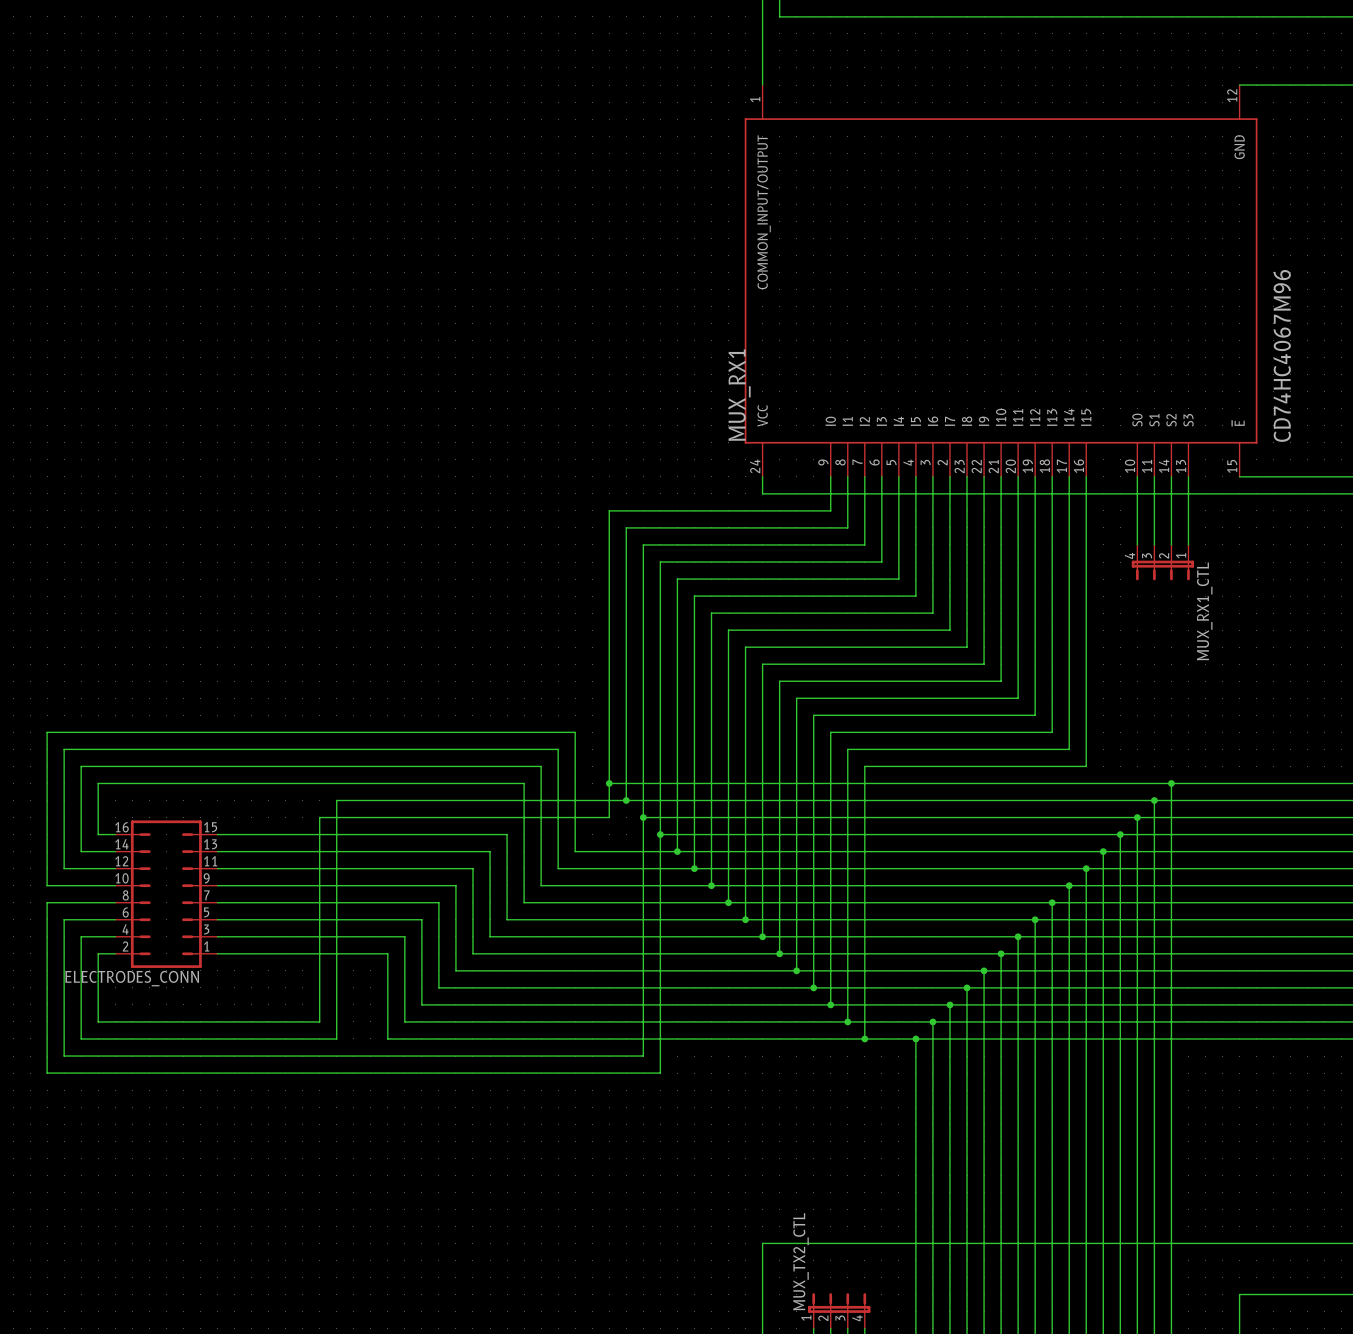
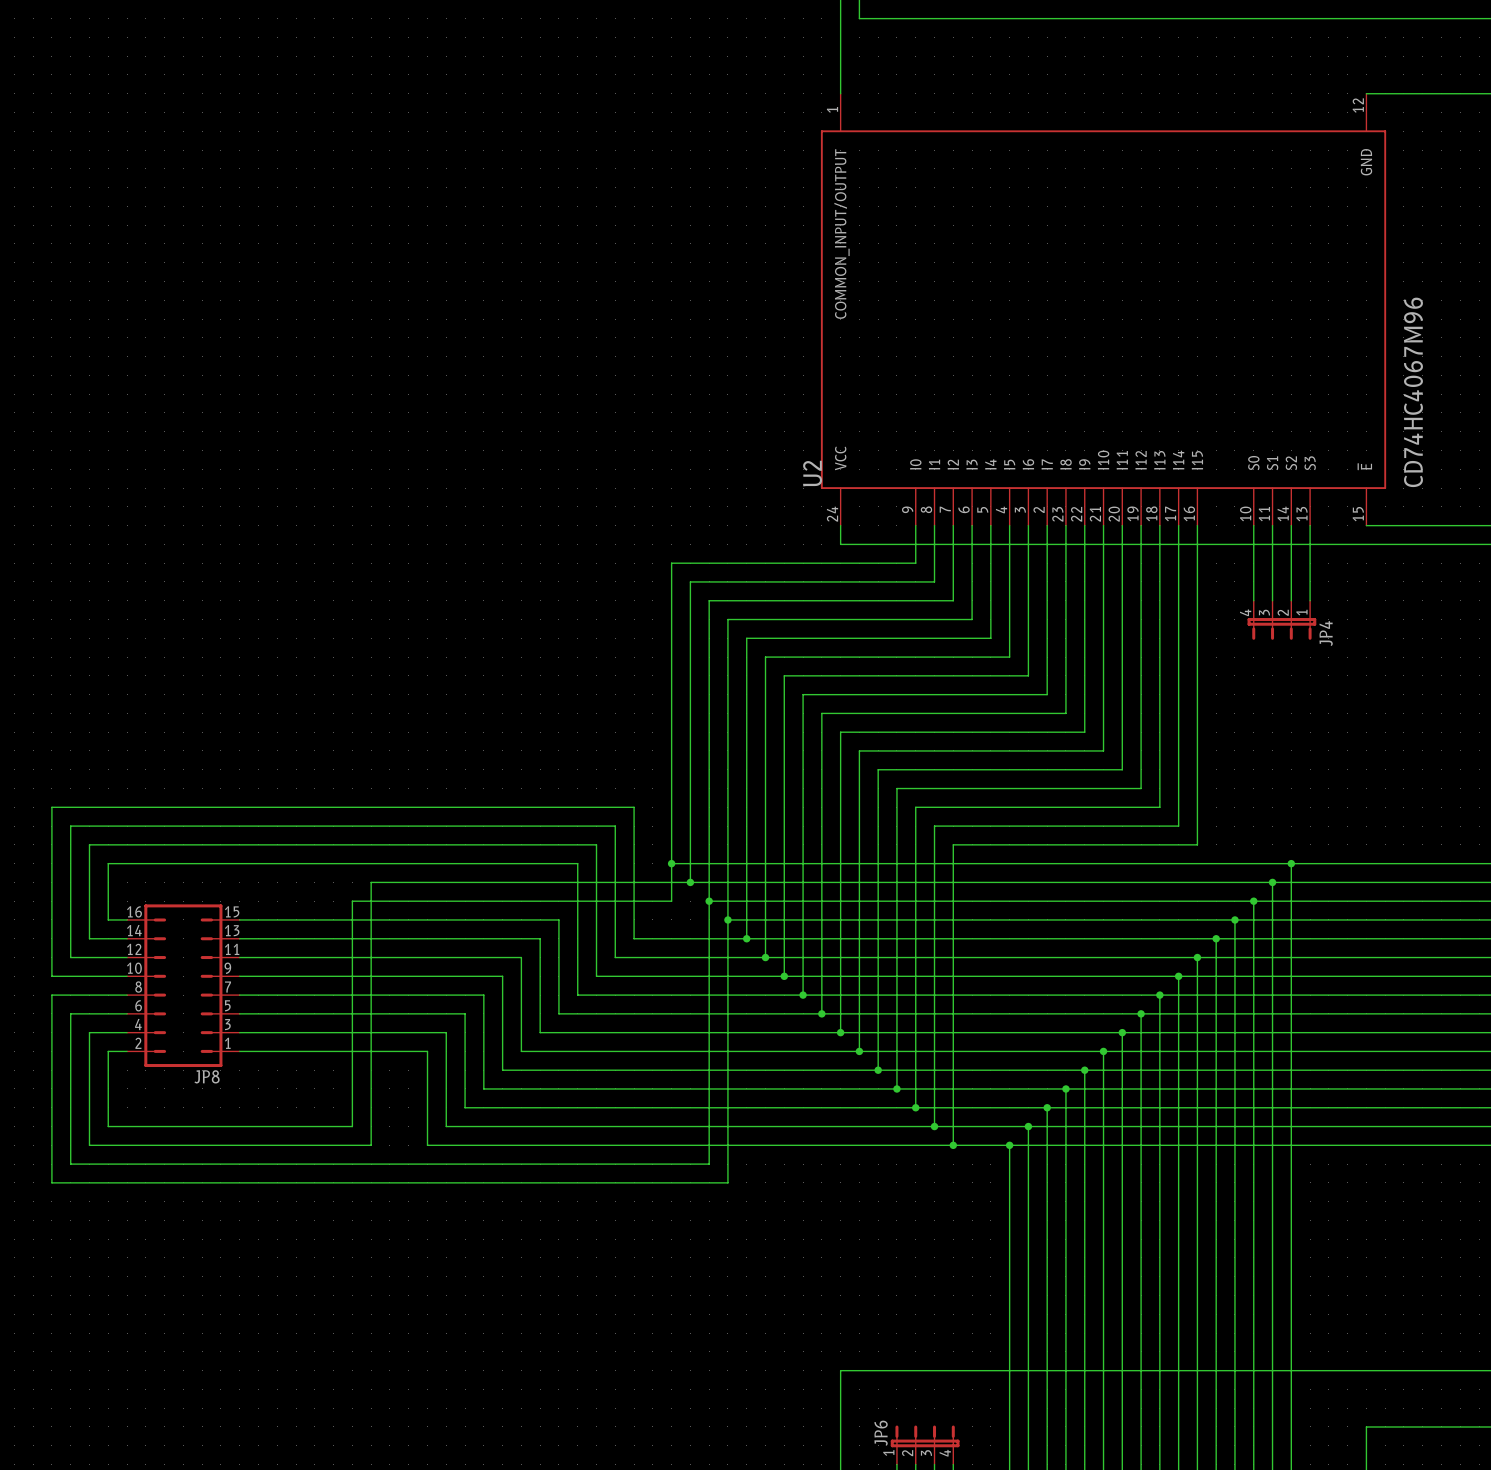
MUX_RX1 name: MUX_RX1 (739, 395) -> U2 (812, 473)
MUX_RX1_CTL name: MUX_RX1_CTL (1204, 611) -> JP4 (1326, 633)
ELECTRODES_CONN name: ELECTRODES_CONN (132, 978) -> JP8 (207, 1076)
MUX_TX2_CTL name: MUX_TX2_CTL (800, 1261) -> JP6 (881, 1433)

